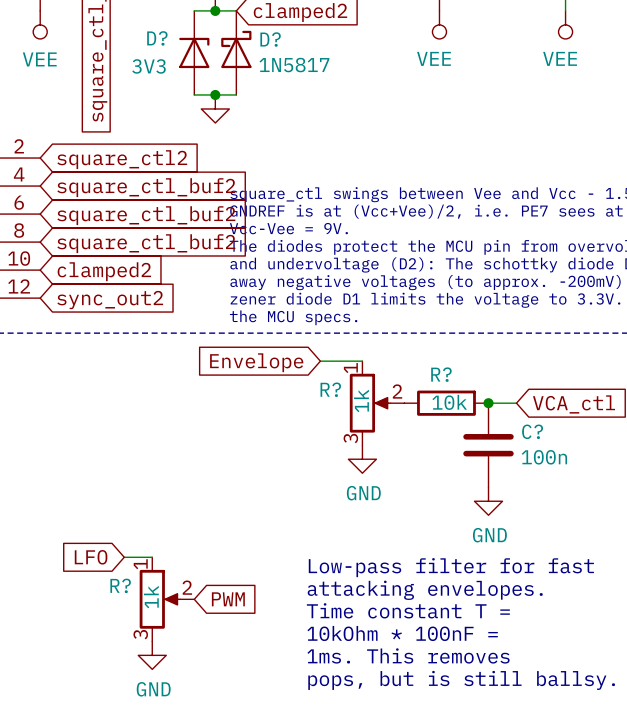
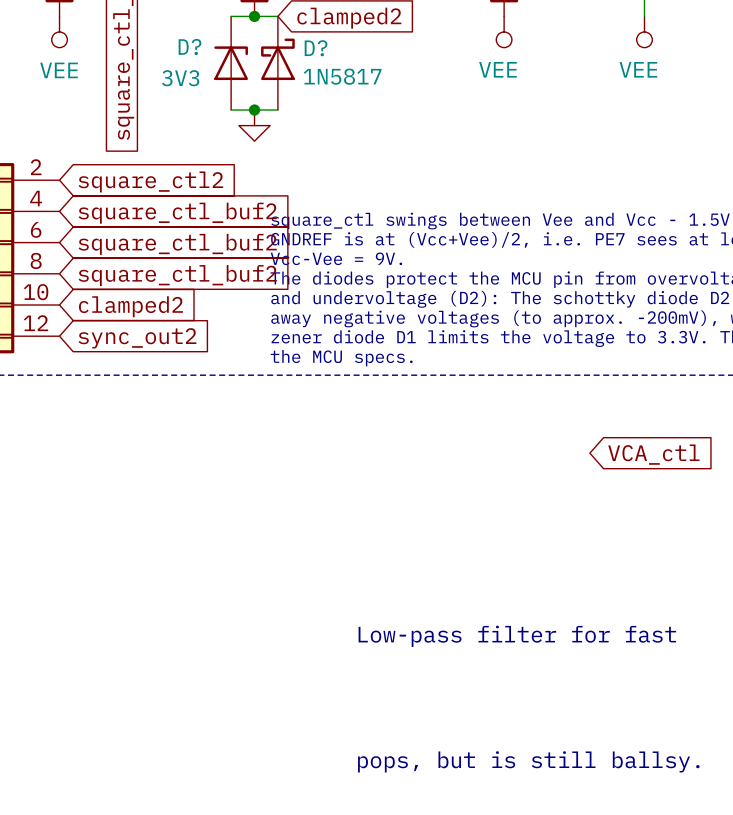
wire: (320, 361) (362, 361) -> none
global label: Envelope (256, 362) -> none
R?: 1k (377, 403) -> none
R?: 10k (446, 403) -> none
wire: (488, 403) (516, 403) -> none
junction: (488, 403) -> none
C?: 100n (488, 445) -> none
power symbol: GND (362, 459) -> none
power symbol: GND (488, 501) -> none
global label: LFO (91, 557) -> none
wire: (124, 557) (152, 557) -> none
text: attacking envelopes. (425, 590) -> none
R?: 1k (166, 599) -> none
global label: PWM (228, 599) -> none
text: Time constant T = (408, 610) -> none
text: 10kOhm * 100nF = (402, 633) -> none
power symbol: GND (152, 655) -> none
text: 1ms. This removes (408, 655) -> none

